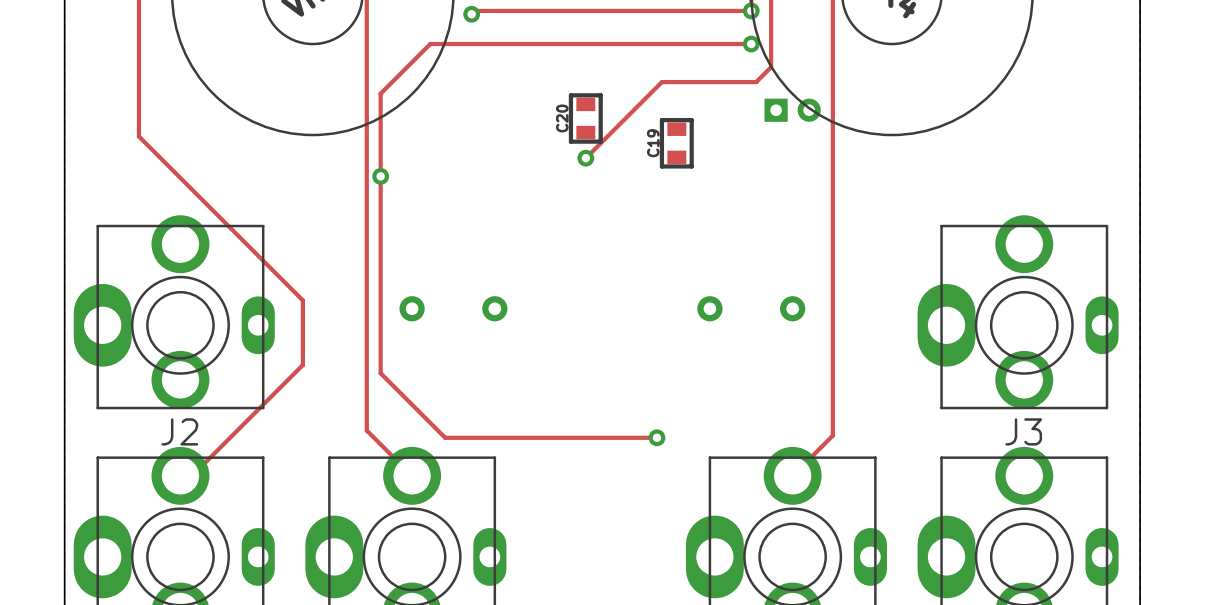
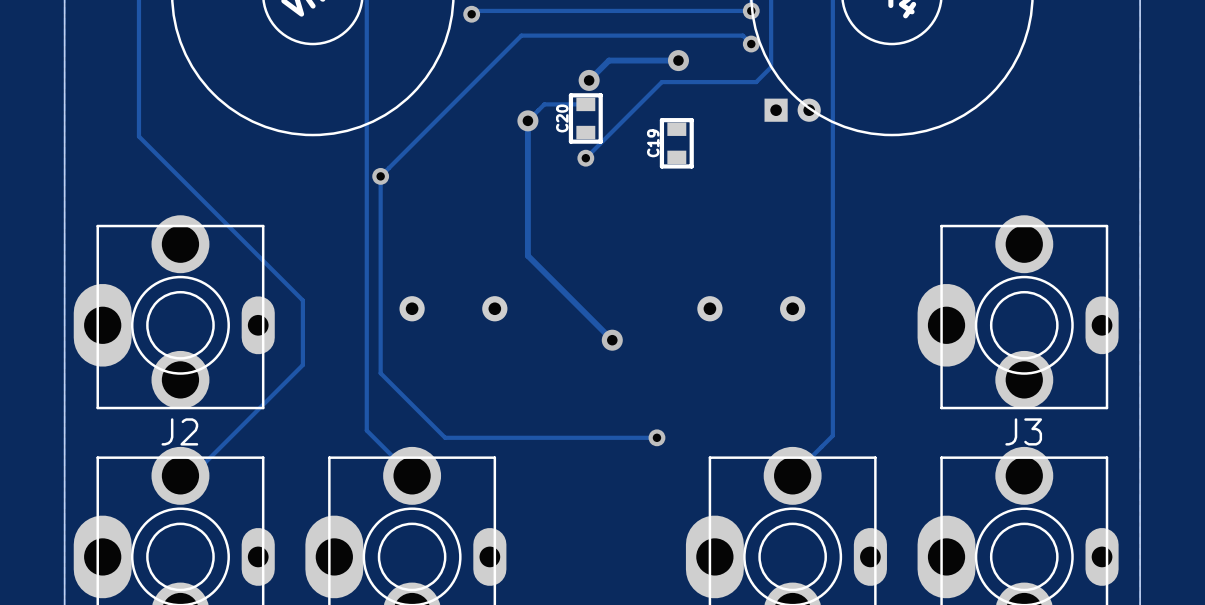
track: (751, 44) (430, 44) (380, 93) (380, 176) -> (751, 44) (742, 35) (521, 35) (380, 176)
track: none -> (678, 60) (608, 60) (589, 80)
via: none -> (678, 60)
via: none -> (589, 80)
track: none -> (585, 104) (544, 104) (527, 120) (527, 255) (612, 340)
via: none -> (527, 120)
via: none -> (612, 340)

